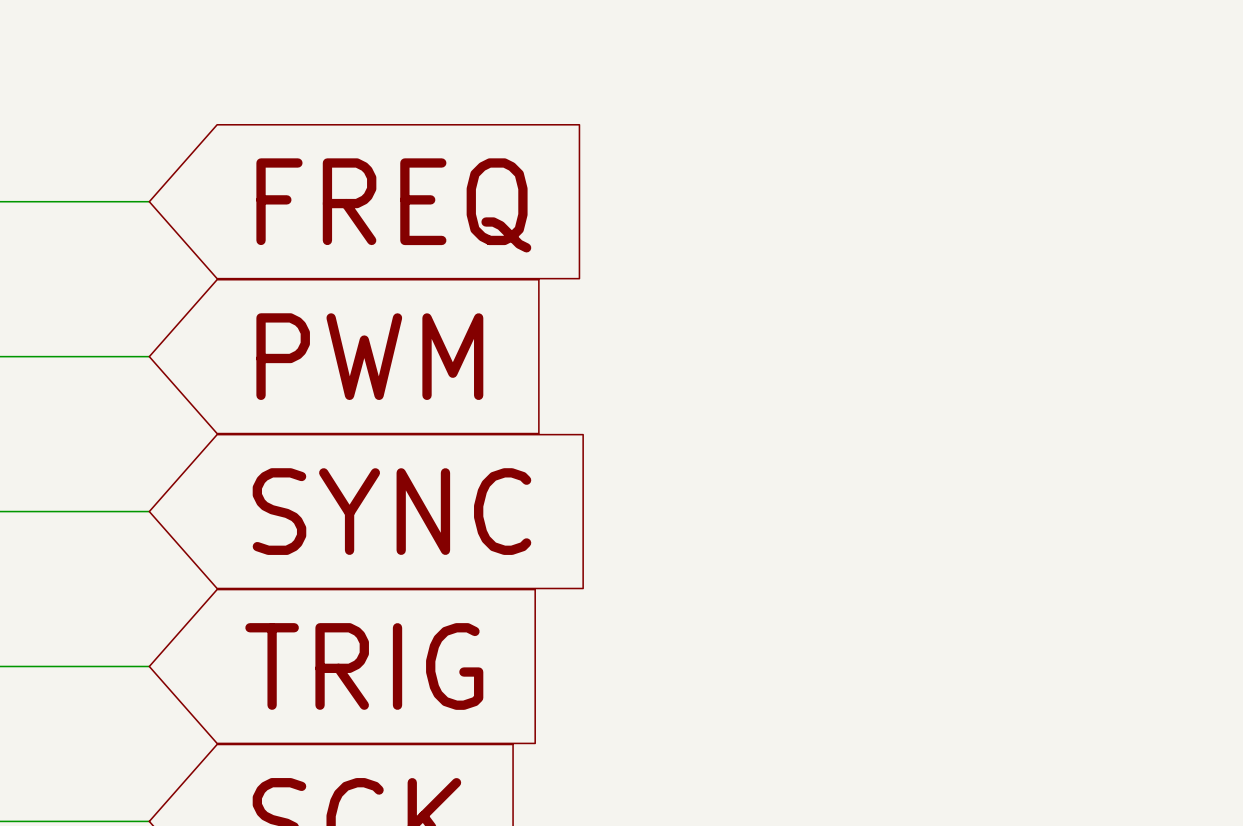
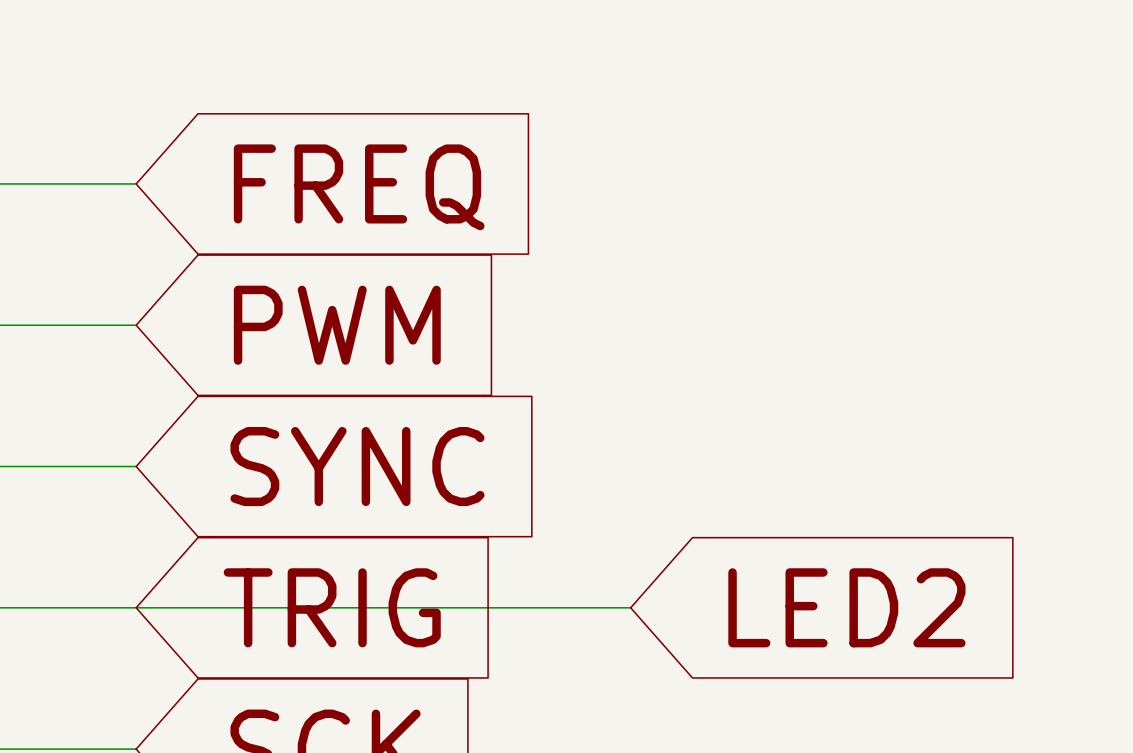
wire: none -> (136, 607) (630, 607)
global label: none -> LED2 (846, 607)

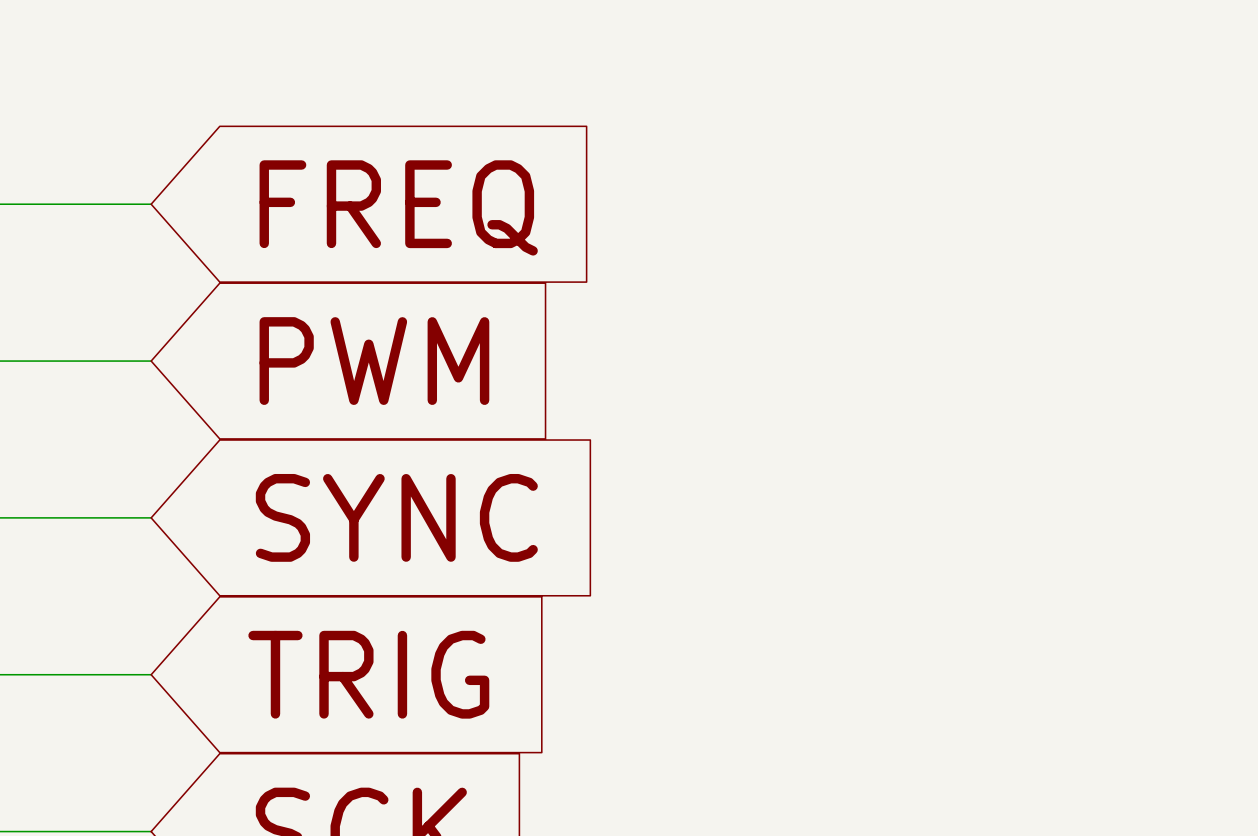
wire: (136, 607) (630, 607) -> none
global label: LED2 (846, 607) -> none

